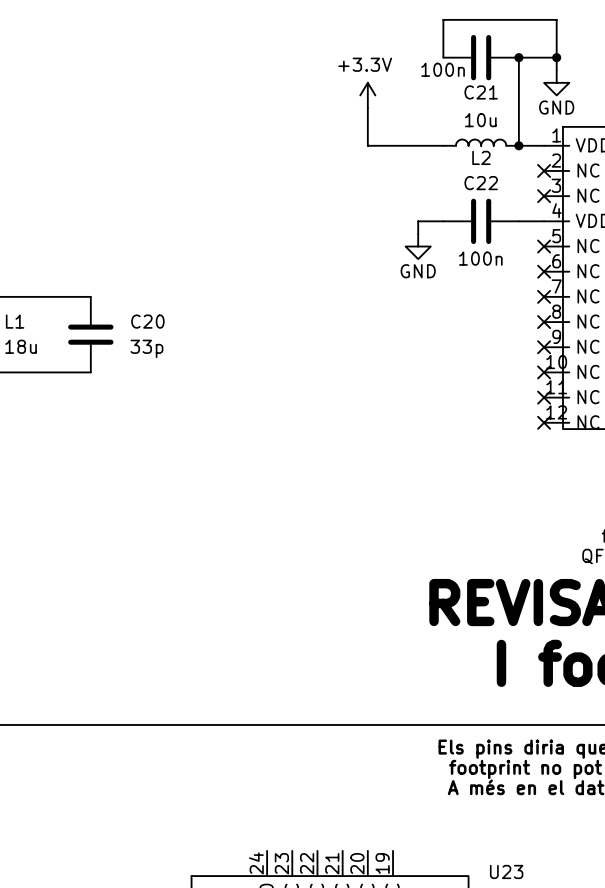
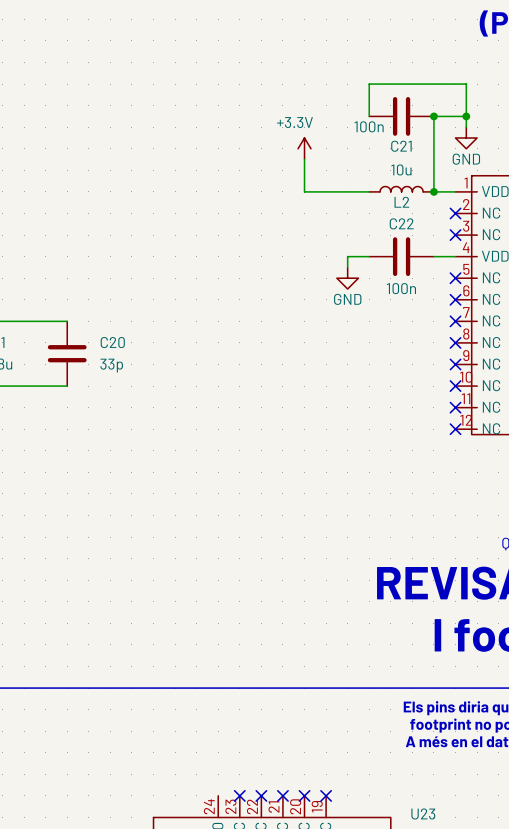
no-connect mark: none -> (239, 795)
no-connect mark: none -> (261, 795)
no-connect mark: none -> (282, 795)
no-connect mark: none -> (304, 795)
no-connect mark: none -> (326, 795)

